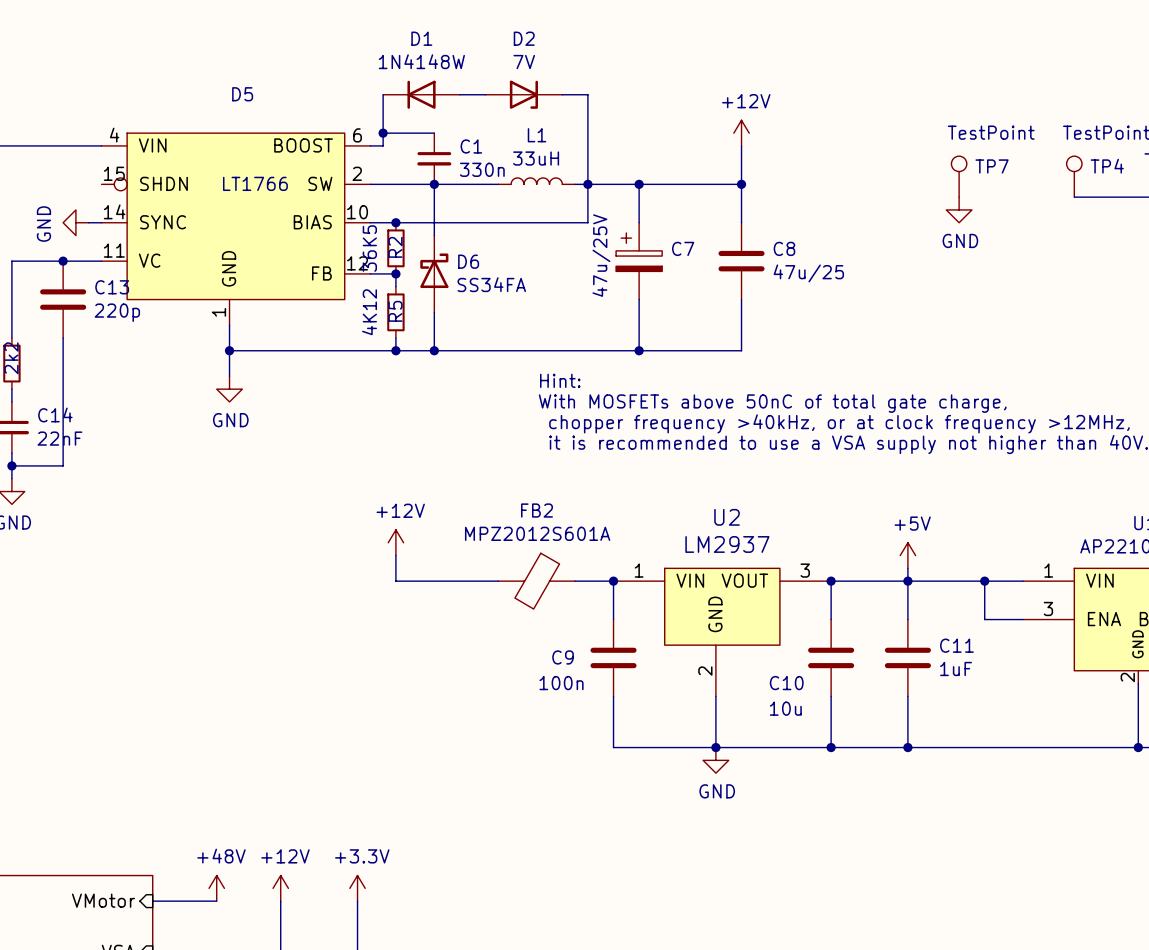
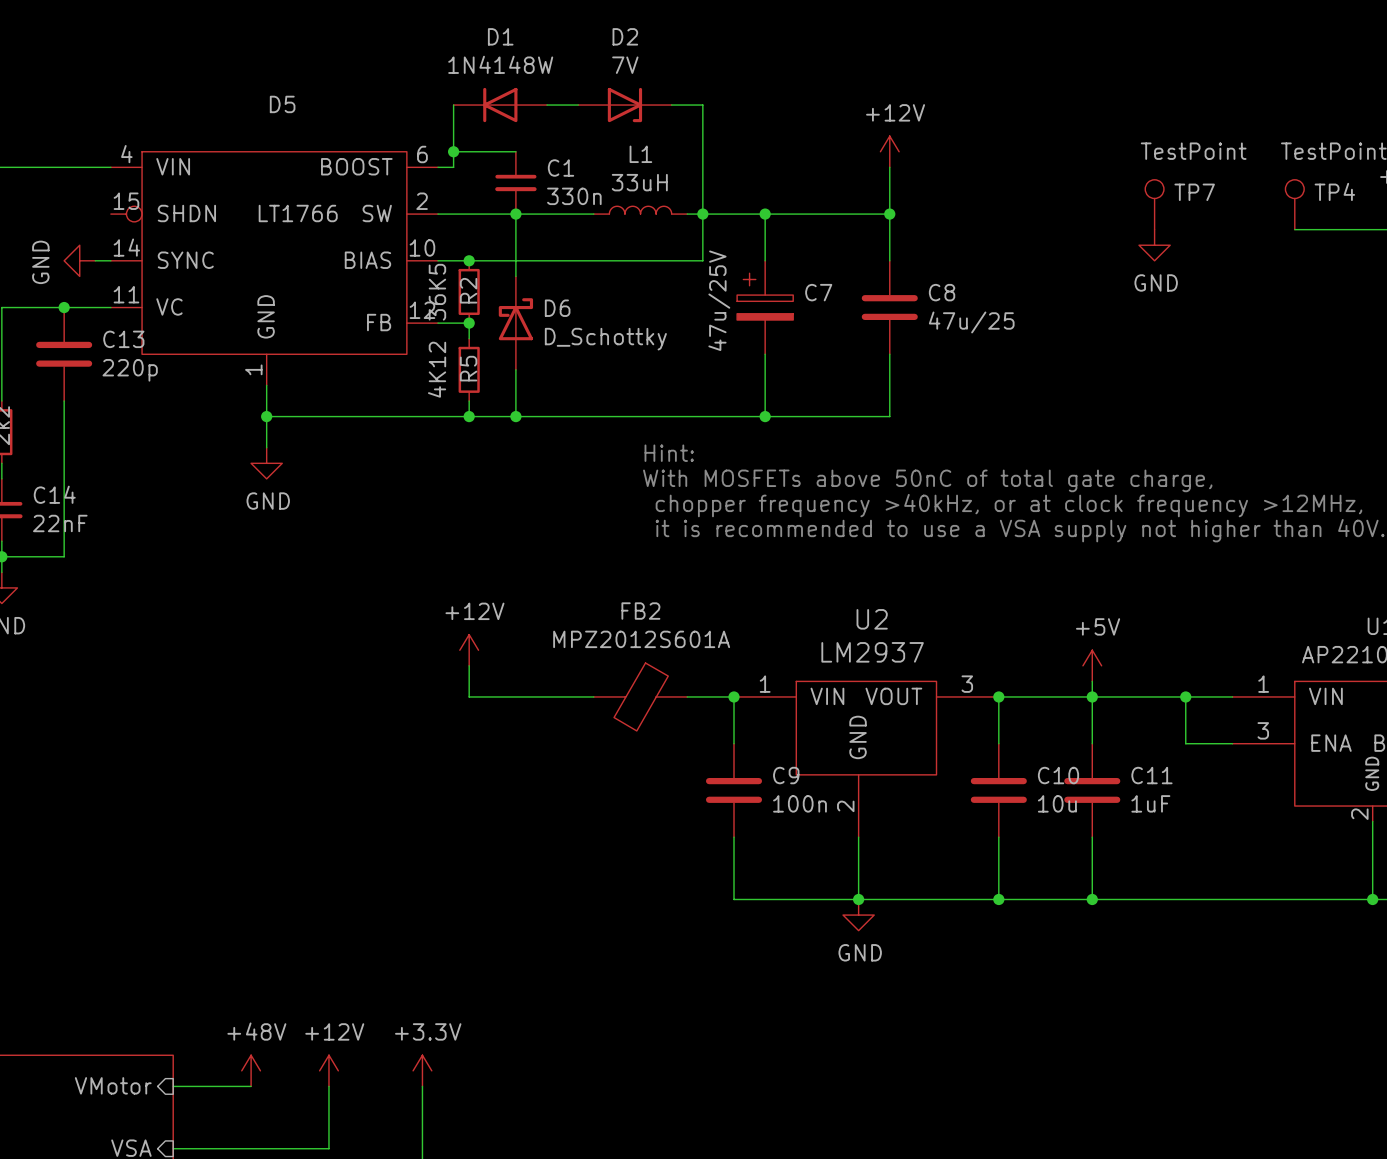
D6 value: SS34FA (491, 284) -> D_Schottky (605, 339)
C9 name position: C9 (563, 657) -> C9 (786, 775)
C9 value position: 100n (561, 683) -> 100n (799, 803)
C10 name position: C10 (786, 683) -> C10 (1058, 775)
C10 value position: 10u (785, 708) -> 10u (1057, 803)

